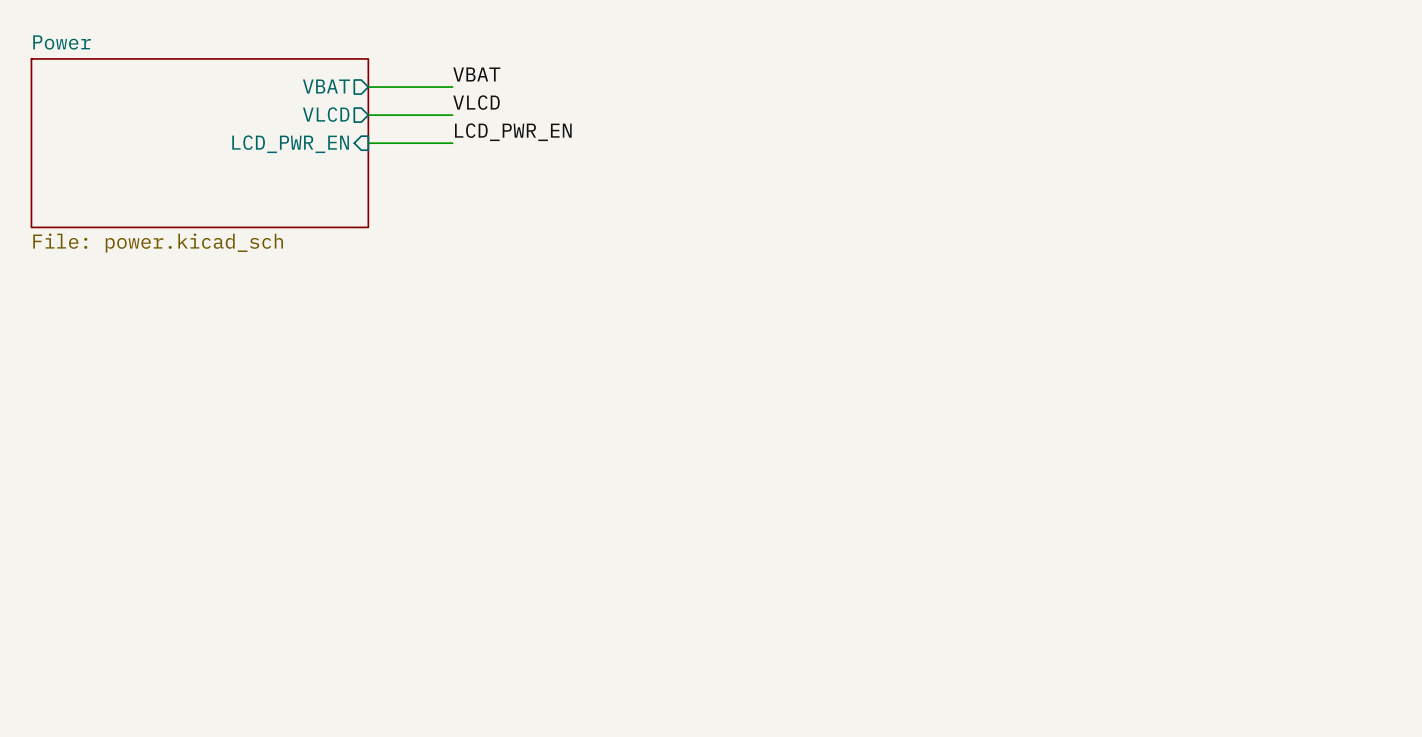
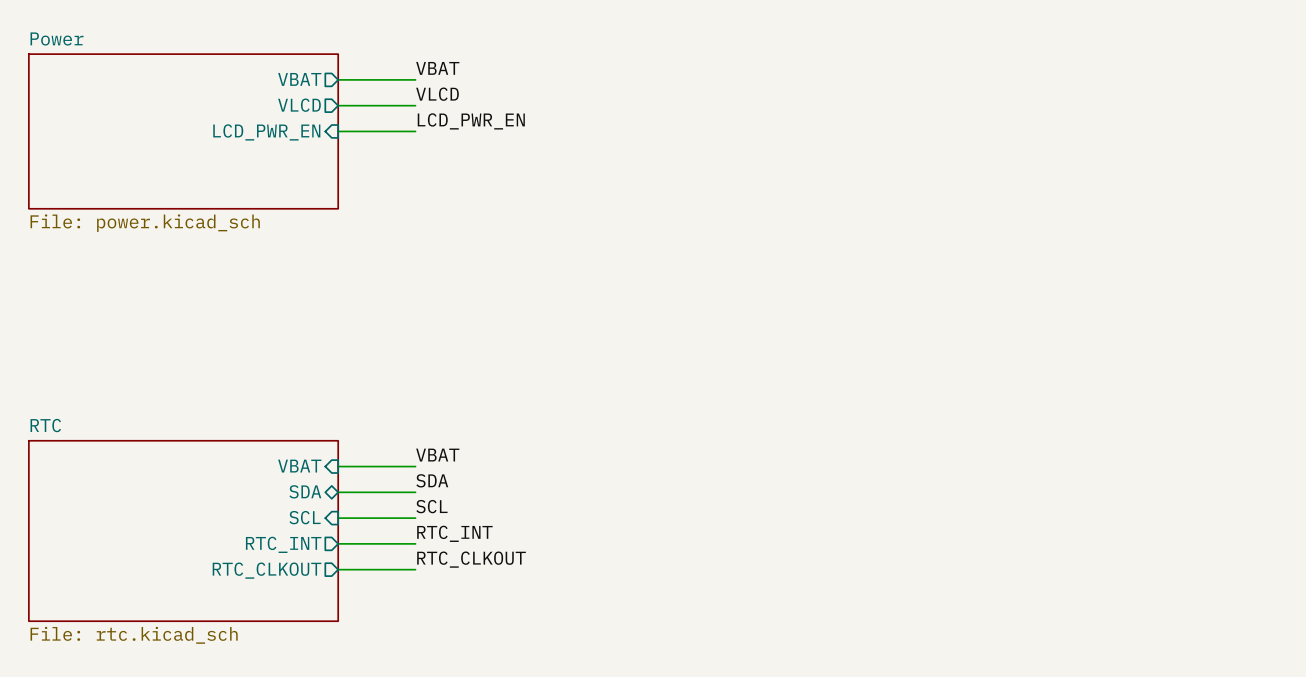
label: none -> VBAT (437, 455)
sheet pin: none -> VBAT (299, 466)
wire: none -> (338, 466) (415, 466)
label: none -> SDA (432, 480)
sheet pin: none -> SDA (305, 491)
wire: none -> (338, 492) (415, 492)
label: none -> SCL (431, 506)
sheet pin: none -> SCL (305, 517)
wire: none -> (338, 518) (415, 518)
sheet RTC: none -> File: rtc.kicad_sch (183, 530)
label: none -> RTC_INT (454, 533)
wire: none -> (338, 543) (415, 543)
sheet pin: none -> RTC_INT (283, 544)
label: none -> RTC_CLKOUT (471, 559)
wire: none -> (338, 569) (415, 569)
sheet pin: none -> RTC_CLKOUT (267, 570)

